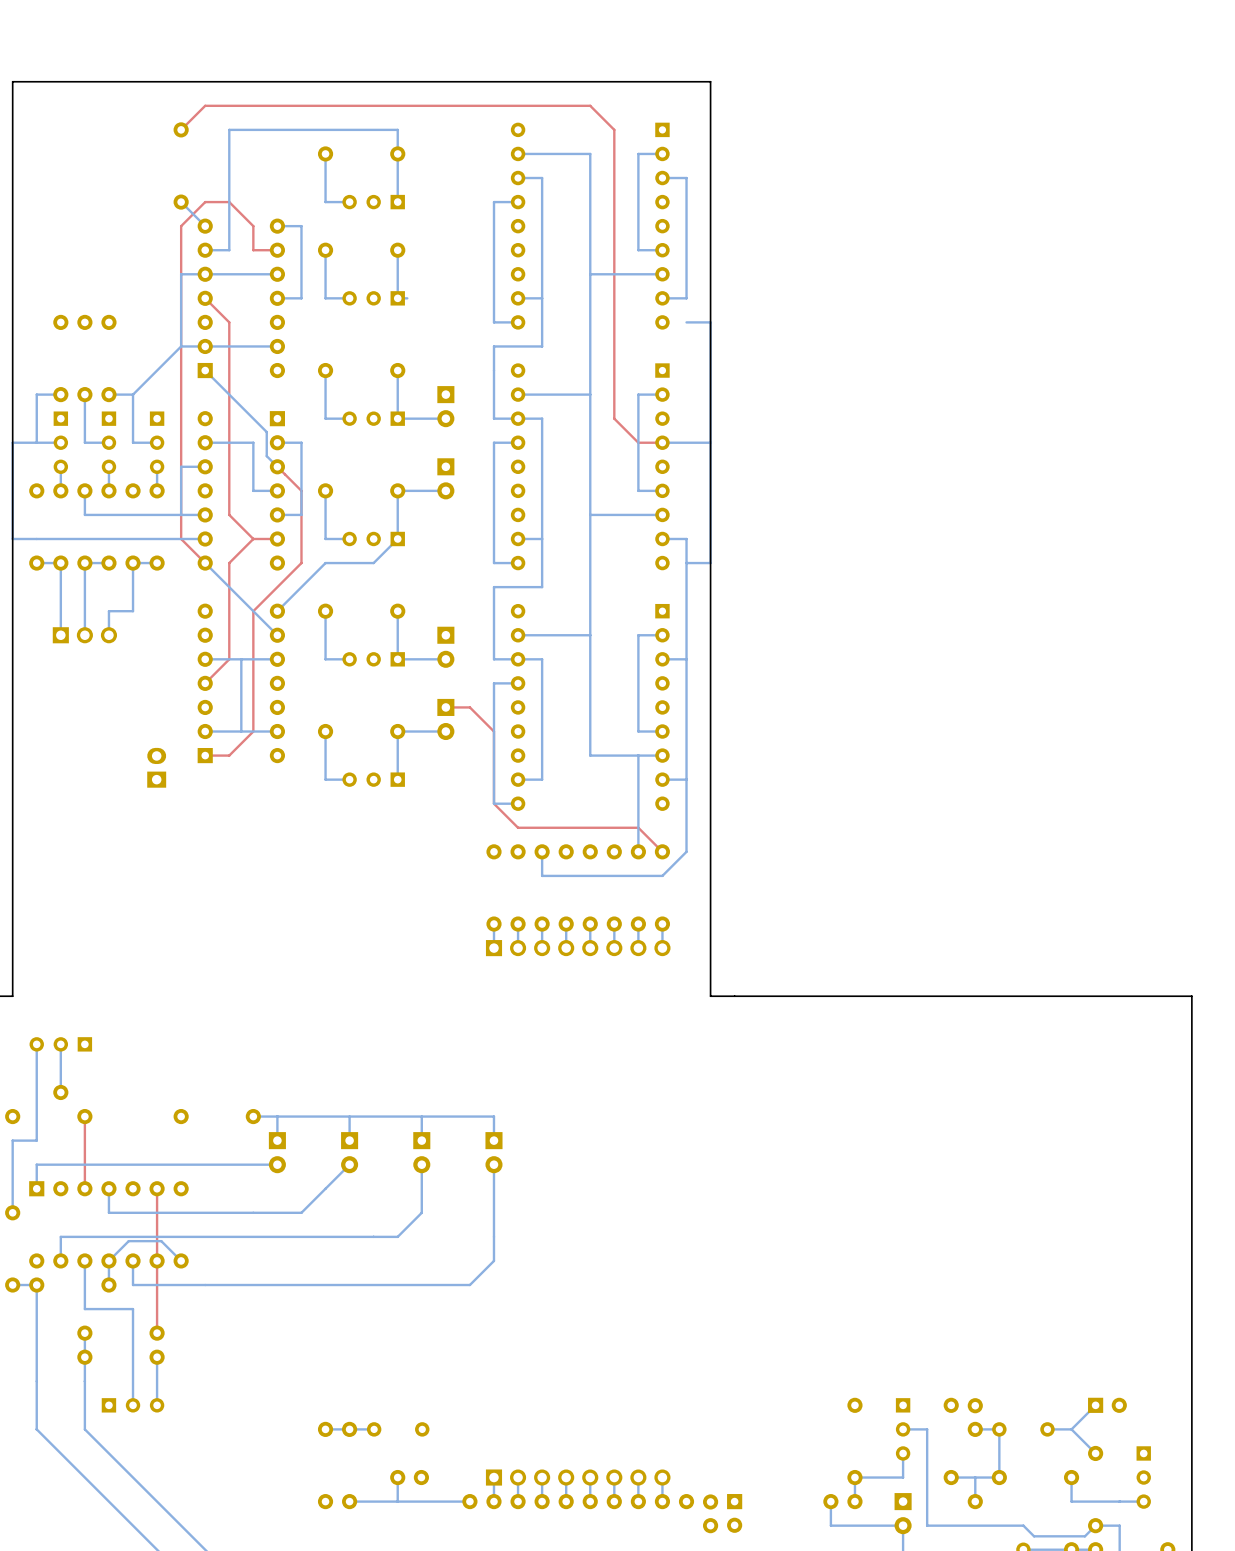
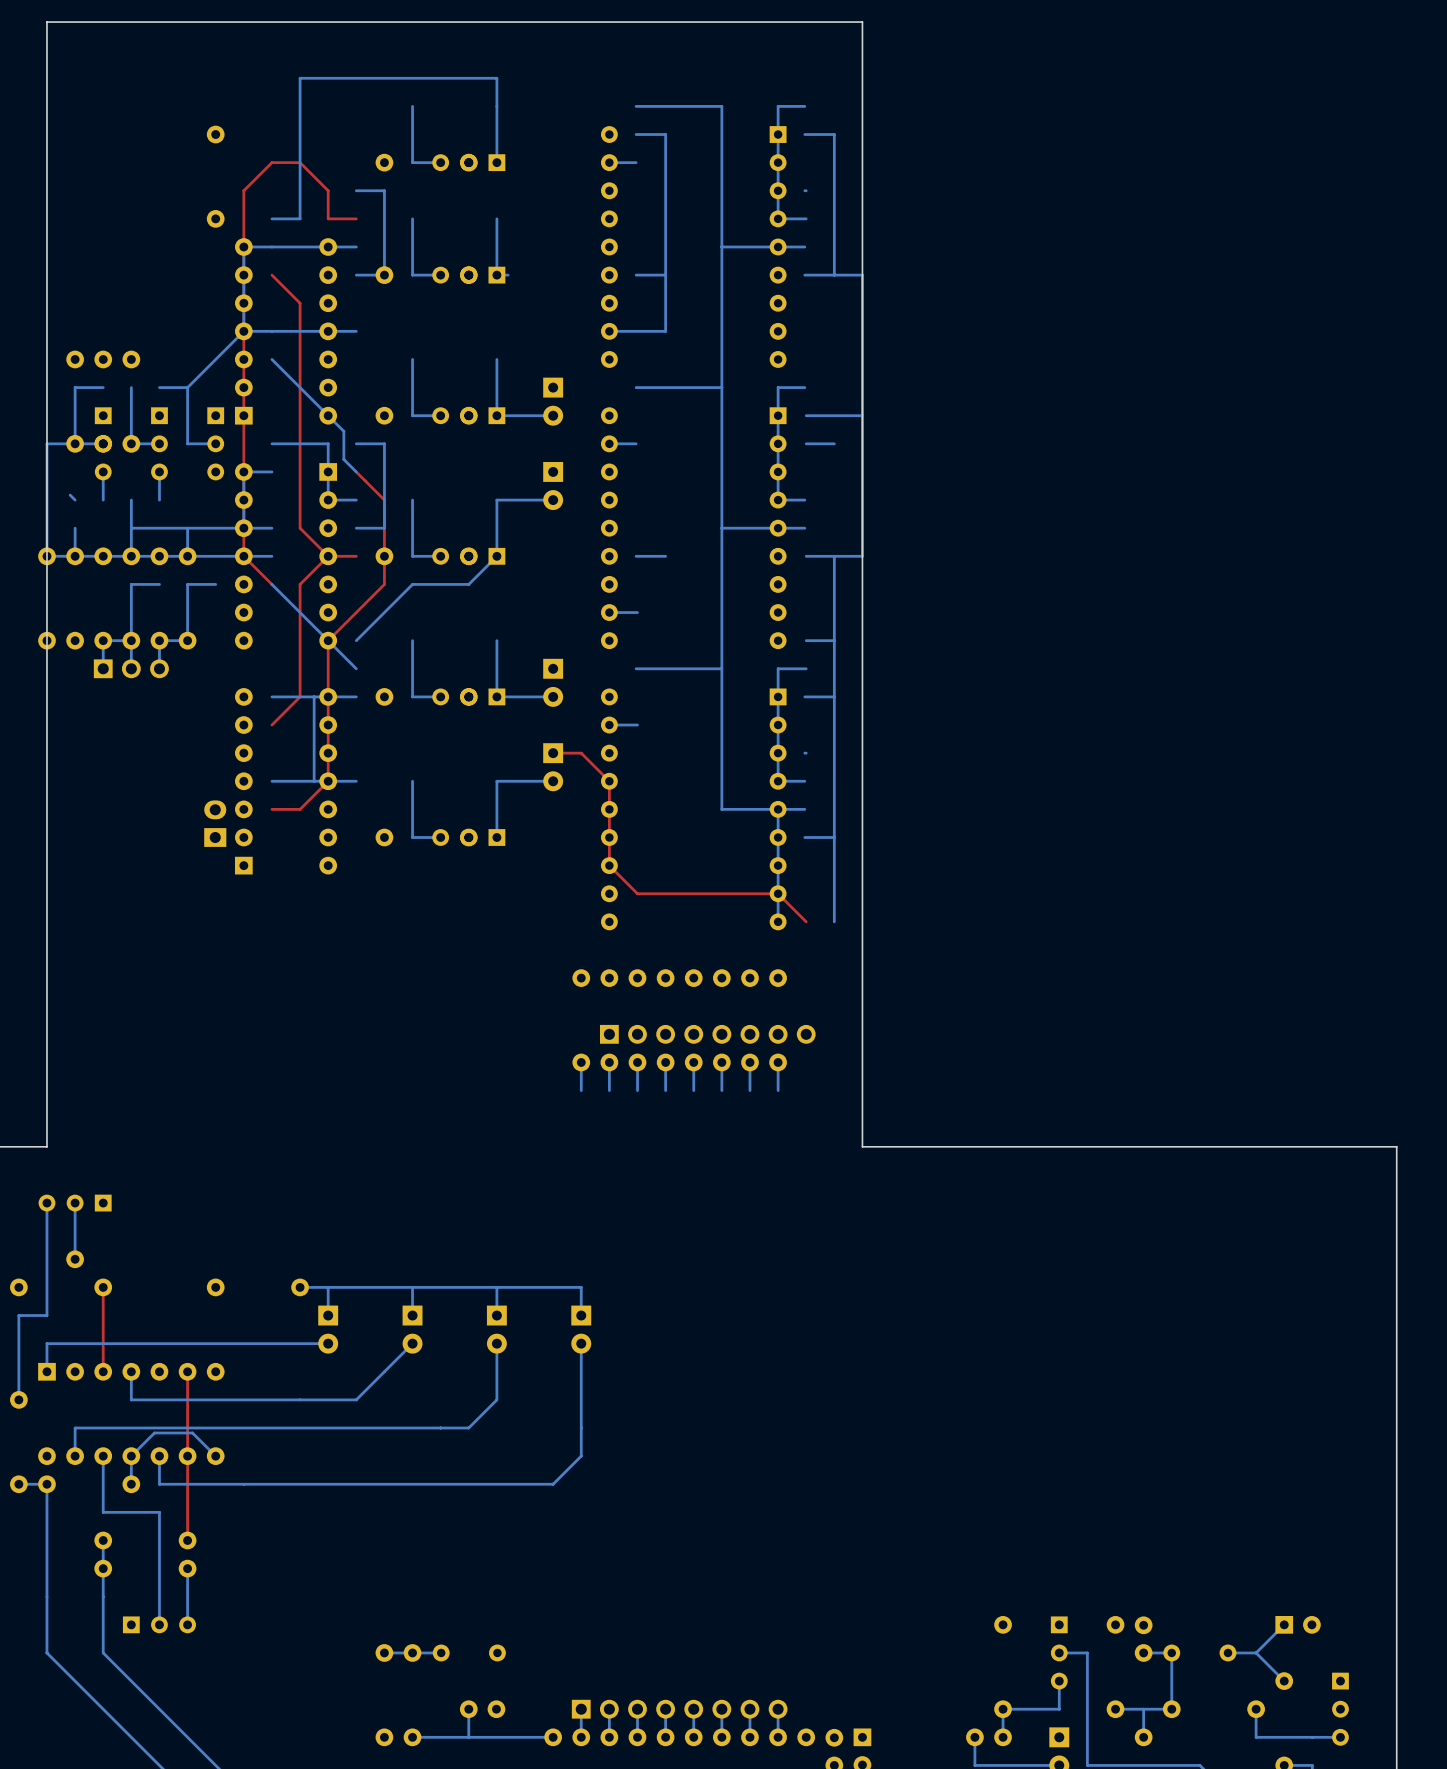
bottom track: none -> (412, 106) (412, 162) (440, 162)
bottom track: none -> (636, 106) (721, 106) (721, 809) (776, 809)
top track: (181, 129) (205, 105) (590, 105) (614, 129) (614, 418) (638, 442) (662, 442) -> none
bottom track: none -> (636, 134) (665, 134) (665, 331) (637, 331)
bottom track: none -> (804, 134) (834, 134) (834, 275)
bottom track: (325, 153) (325, 178) -> (356, 190) (384, 190)
part: none -> (468, 162)
bottom track: (540, 153) (590, 153) (590, 755) (661, 755) -> none
bottom track: (661, 153) (638, 153) (638, 250) (662, 250) -> (804, 106) (778, 106) (778, 218) (806, 218)
bottom track: (516, 178) (542, 178) (542, 346) -> (721, 387) (637, 387)
bottom track: (685, 178) (661, 178) -> (834, 443) (806, 443)
bottom track: (686, 178) (686, 298) (661, 298) -> none
bottom track: (181, 202) (205, 226) -> none
bottom track: (349, 202) (325, 202) -> (356, 275) (384, 275) (384, 218)
part: (373, 202) -> none
bottom track: (397, 202) (397, 129) (229, 129) (229, 250) (205, 250) -> (496, 162) (496, 78) (300, 78) (300, 218) (271, 218)
bottom track: (516, 202) (494, 202) (494, 322) (516, 322) -> none
bottom track: none -> (328, 246) (243, 246) (243, 331)
bottom track: (301, 226) (301, 298) -> none
bottom track: none -> (776, 246) (721, 246)
bottom track: none -> (804, 246) (778, 246)
top track: (277, 250) (253, 250) (253, 226) (229, 202) (205, 202) (181, 226) (181, 538) (205, 563) -> (356, 218) (328, 218) (328, 190) (300, 162) (271, 162) (243, 190) (243, 556) (271, 584)
bottom track: (325, 250) (325, 298) (349, 298) -> (412, 218) (412, 275) (440, 275)
bottom track: (397, 250) (397, 298) (407, 298) -> (496, 218) (496, 275) (508, 275)
part: none -> (468, 275)
bottom track: none -> (665, 275) (636, 275)
bottom track: none -> (804, 275) (862, 275) (862, 556) (806, 556)
bottom track: (277, 274) (181, 274) (181, 346) -> none
bottom track: (661, 274) (590, 274) -> none
bottom track: none -> (243, 331) (187, 387)
top track: (205, 298) (229, 322) (229, 514) (253, 538) -> (271, 275) (300, 303) (300, 528) (328, 556)
bottom track: none -> (328, 331) (243, 331)
part: (373, 298) -> none
bottom track: none -> (412, 359) (412, 415) (440, 415)
bottom track: (686, 322) (710, 322) (710, 490) -> none
bottom track: none -> (131, 387) (131, 443)
bottom track: (181, 346) (133, 394) (133, 418) -> none
bottom track: (277, 346) (181, 346) -> none
bottom track: (540, 346) (494, 346) (494, 418) (542, 418) (542, 587) -> (721, 668) (637, 668)
bottom track: none -> (804, 387) (778, 387) (778, 500)
part: none -> (553, 401)
bottom track: (205, 370) (266, 432) (266, 456) (277, 466) -> (271, 359) (343, 431) (343, 459) (356, 471)
bottom track: (325, 370) (325, 394) -> (356, 443) (384, 443)
bottom track: (397, 370) (397, 418) (445, 418) -> (496, 359) (496, 415) (553, 415)
part: none -> (468, 415)
bottom track: none -> (862, 415) (806, 415)
bottom track: (84, 394) (84, 418) -> (103, 443) (75, 443) (75, 387) (103, 387)
part: none -> (103, 443)
part: none -> (159, 443)
part: none -> (215, 443)
bottom track: none -> (271, 443) (328, 443) (328, 500)
bottom track: (590, 394) (540, 394) -> none
bottom track: (661, 394) (638, 394) (638, 490) (661, 490) -> none
part: (445, 406) -> none
bottom track: none -> (271, 471) (243, 471) (243, 528) (271, 528)
bottom track: (349, 418) (325, 418) -> (356, 528) (384, 528) (384, 471)
part: (373, 418) -> none
part: none -> (553, 486)
bottom track: none -> (47, 500) (47, 556) (271, 556)
bottom track: (60, 442) (12, 442) (12, 538) (205, 538) -> (75, 500) (70, 495)
part: (60, 442) -> none
bottom track: (108, 442) (84, 442) -> (131, 500) (131, 528) (215, 528)
part: (108, 442) -> none
bottom track: (157, 442) (133, 442) -> (187, 387) (159, 387)
part: (157, 442) -> none
bottom track: (205, 442) (253, 442) (253, 490) (277, 490) -> none
bottom track: (301, 442) (301, 514) (277, 514) -> none
bottom track: (516, 442) (494, 442) (494, 563) (516, 563) -> none
bottom track: (710, 442) (685, 442) -> (665, 556) (636, 556)
bottom track: (181, 466) (181, 514) (205, 514) -> (187, 387) (187, 443) (215, 443)
top track: (277, 466) (301, 490) (301, 563) (253, 611) (253, 731) (229, 755) (205, 755) -> (356, 471) (384, 500) (384, 584) (328, 640) (328, 781) (300, 809) (271, 809)
part: (445, 478) -> none
bottom track: (84, 490) (84, 514) (108, 514) -> (131, 668) (131, 584)
bottom track: (325, 490) (325, 538) (349, 538) -> (412, 500) (412, 556) (440, 556)
part: none -> (468, 556)
bottom track: (445, 490) (397, 490) (397, 538) (373, 563) (325, 563) (277, 611) -> (553, 500) (496, 500) (496, 556) (468, 584) (412, 584) (356, 640)
bottom track: (157, 514) (133, 514) -> (187, 584) (187, 640)
bottom track: (661, 514) (590, 514) -> (804, 528) (721, 528)
top track: (253, 538) (229, 563) (229, 659) (205, 683) -> (328, 556) (300, 584) (300, 696) (271, 725)
top track: (277, 538) (253, 538) -> (356, 556) (328, 556)
part: (373, 538) -> none
bottom track: (662, 538) (686, 538) (686, 851) (662, 875) (542, 875) (542, 851) -> none
bottom track: (36, 563) (60, 563) (60, 635) -> none
bottom track: (205, 563) (277, 635) -> (271, 584) (356, 668)
bottom track: (84, 587) (84, 635) -> none
bottom track: (133, 587) (133, 611) (108, 611) (108, 635) -> none
bottom track: (540, 587) (494, 587) (494, 659) (542, 659) (542, 779) (516, 779) -> none
part: none -> (553, 682)
bottom track: (325, 611) (325, 659) (349, 659) -> (412, 640) (412, 696) (440, 696)
bottom track: (397, 611) (397, 659) (445, 659) -> (496, 640) (496, 696) (553, 696)
part: none -> (468, 696)
bottom track: none -> (834, 696) (804, 696)
part position: (84, 635) -> (131, 668)
bottom track: (590, 635) (542, 635) -> none
bottom track: (662, 635) (638, 635) (638, 731) (661, 731) -> (806, 668) (778, 668) (778, 781) (804, 781)
part: (445, 647) -> none
bottom track: (241, 659) (241, 731) -> (314, 696) (314, 781)
bottom track: (277, 659) (205, 659) -> (356, 696) (271, 696)
part: (373, 659) -> none
bottom track: (685, 659) (661, 659) -> none
part: none -> (553, 767)
bottom track: (518, 683) (494, 683) (494, 803) (516, 803) -> none
top track: (445, 707) (469, 707) (493, 731) (493, 803) (518, 827) (638, 827) (662, 851) -> (553, 753) (581, 753) (609, 781) (609, 865) (637, 893) (778, 893) (806, 921)
bottom track: none -> (804, 809) (778, 809) (778, 921)
part: (445, 719) -> none
bottom track: (277, 731) (205, 731) -> (356, 781) (271, 781)
bottom track: (325, 731) (325, 779) (349, 779) -> (412, 781) (412, 837) (440, 837)
part: none -> (468, 837)
bottom track: (445, 731) (397, 731) (397, 779) -> (553, 781) (496, 781) (496, 837)
bottom track: (638, 755) (638, 851) -> none
part position: (156, 767) -> (215, 823)
part: (373, 779) -> none
bottom track: (686, 779) (661, 779) -> (834, 837) (804, 837)
part position: (578, 948) -> (707, 1034)
board edge: (734, 996) (710, 996) (710, 81) (12, 81) (12, 996) -> (862, 1146) (862, 22) (46, 22) (46, 1146) (18, 1146)

